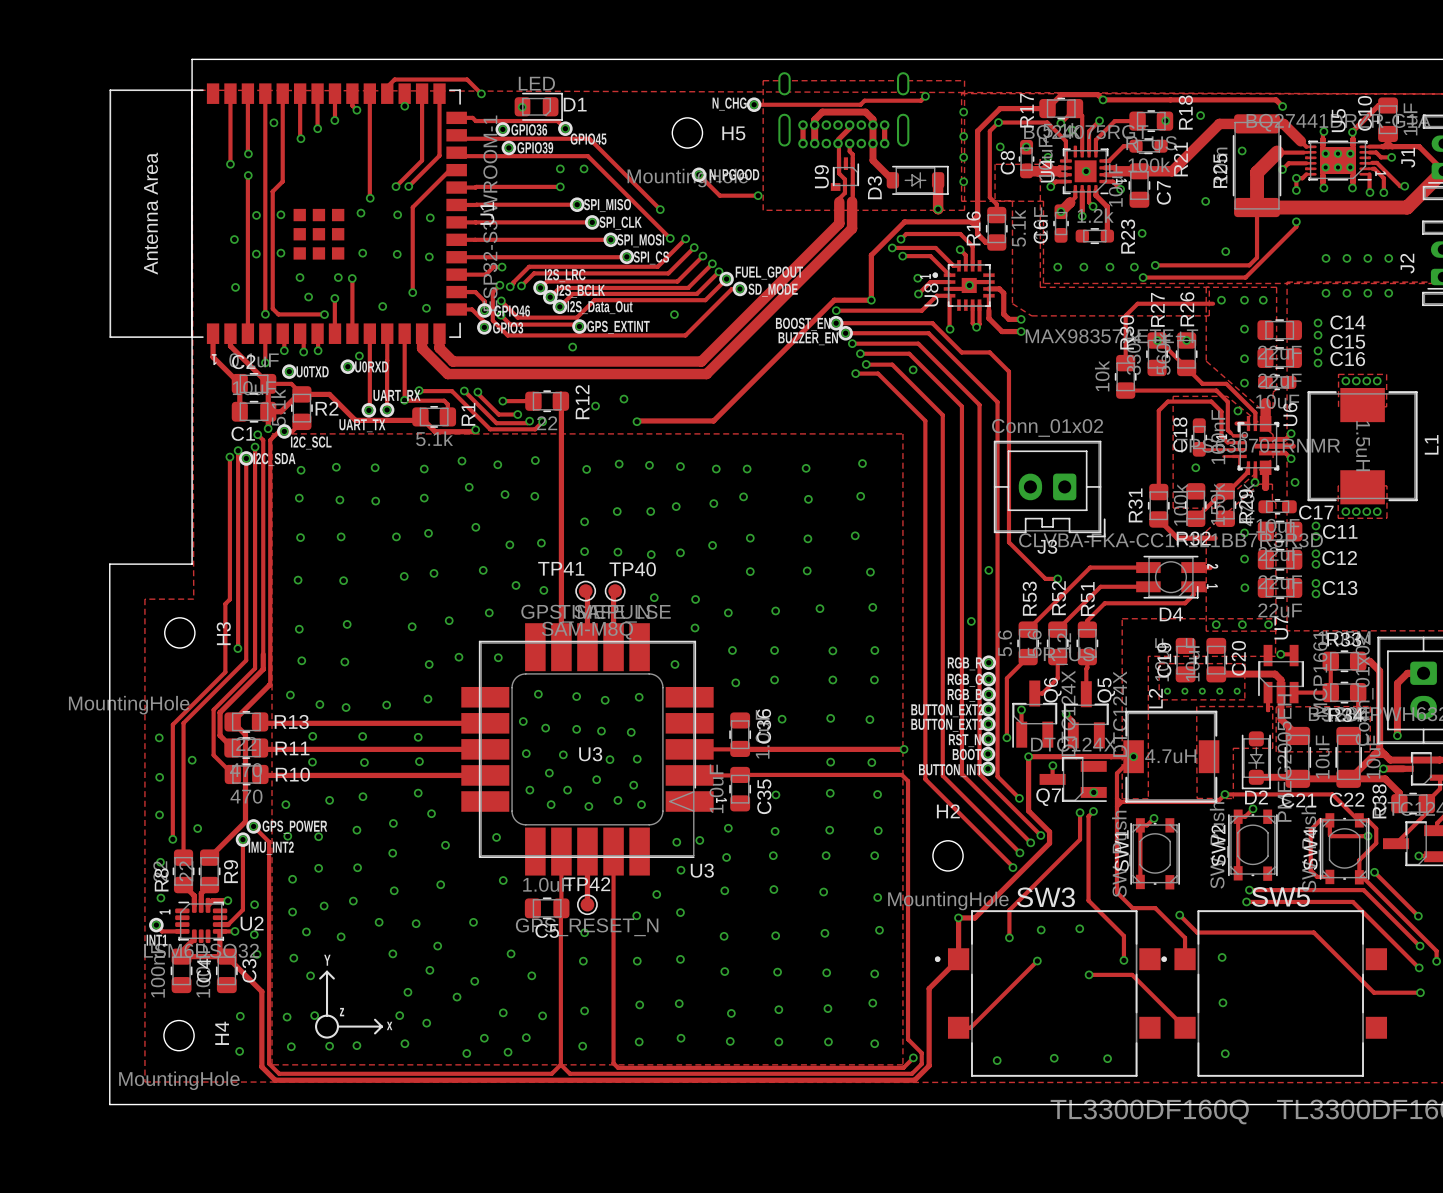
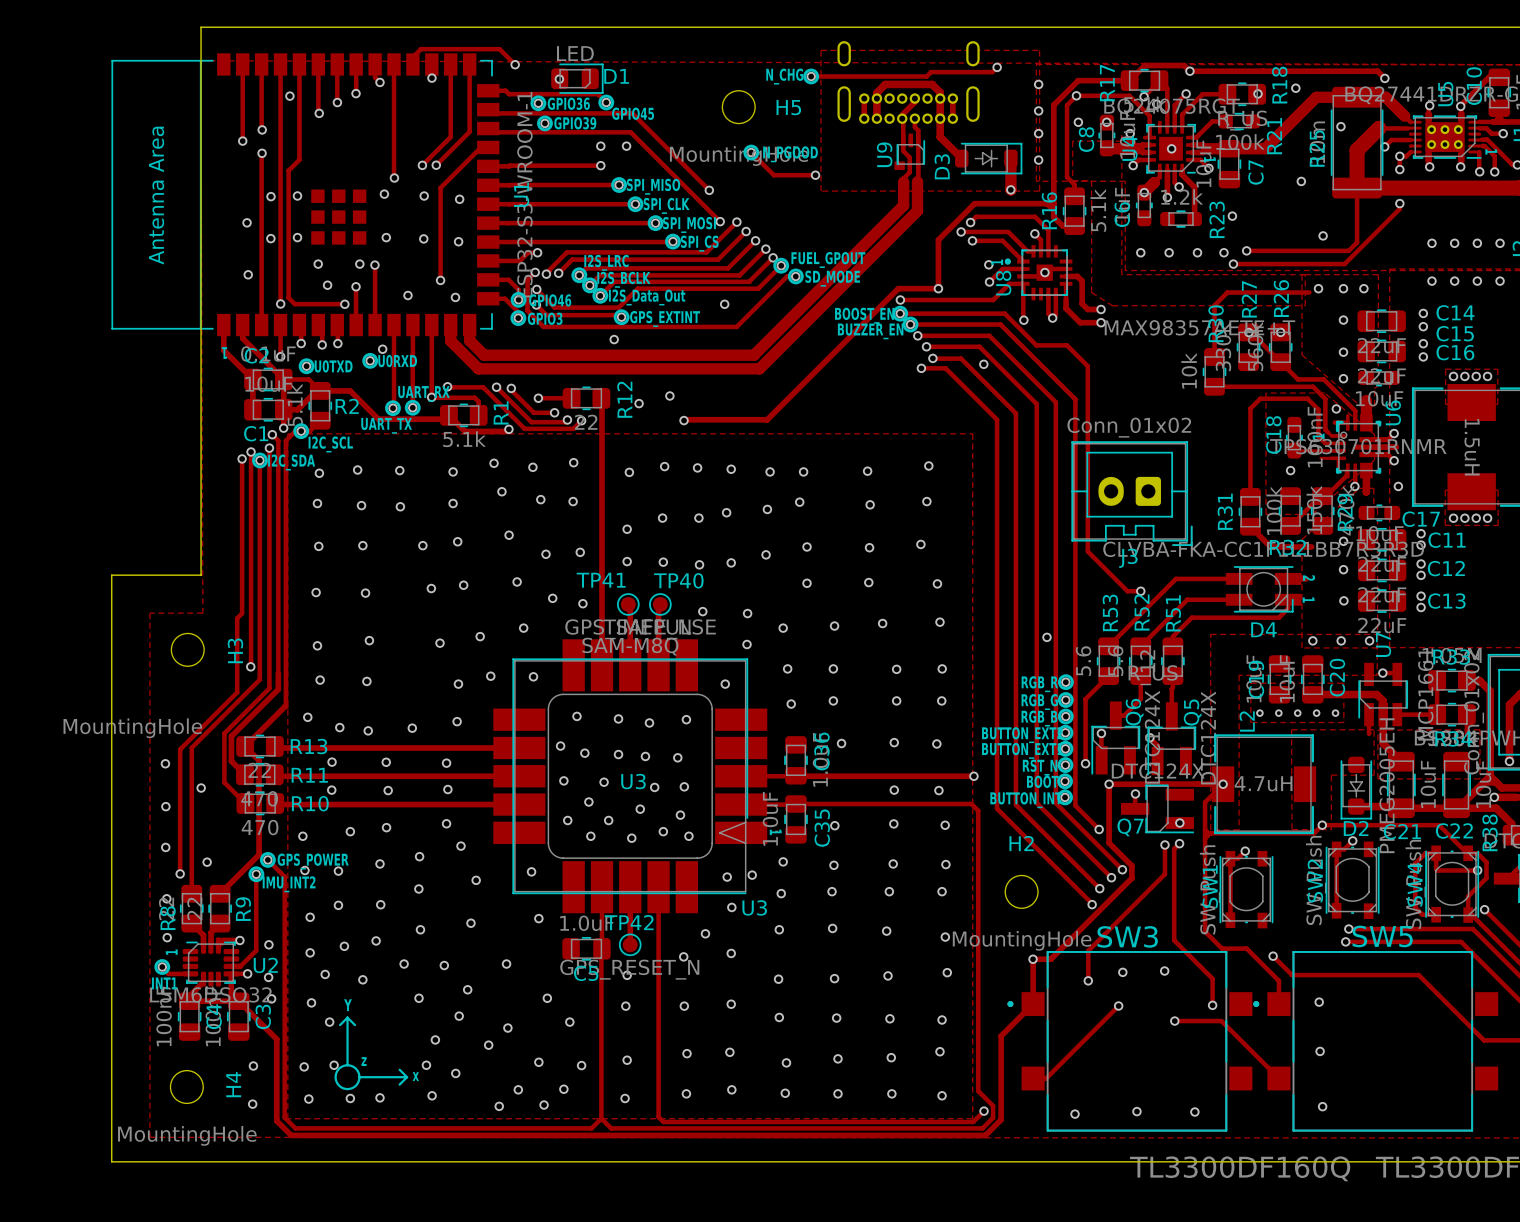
via: (988, 570) -> none

